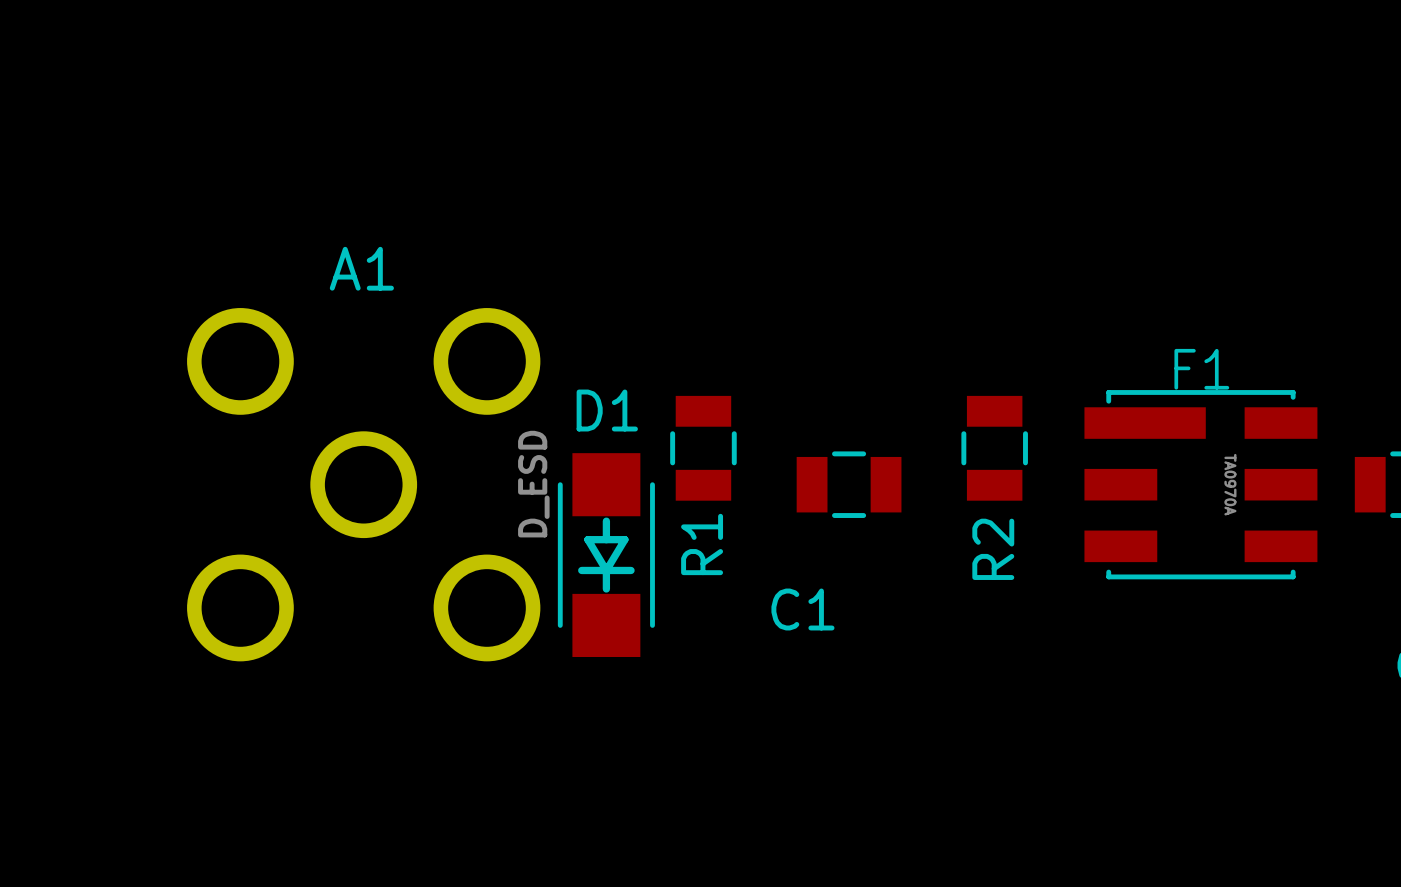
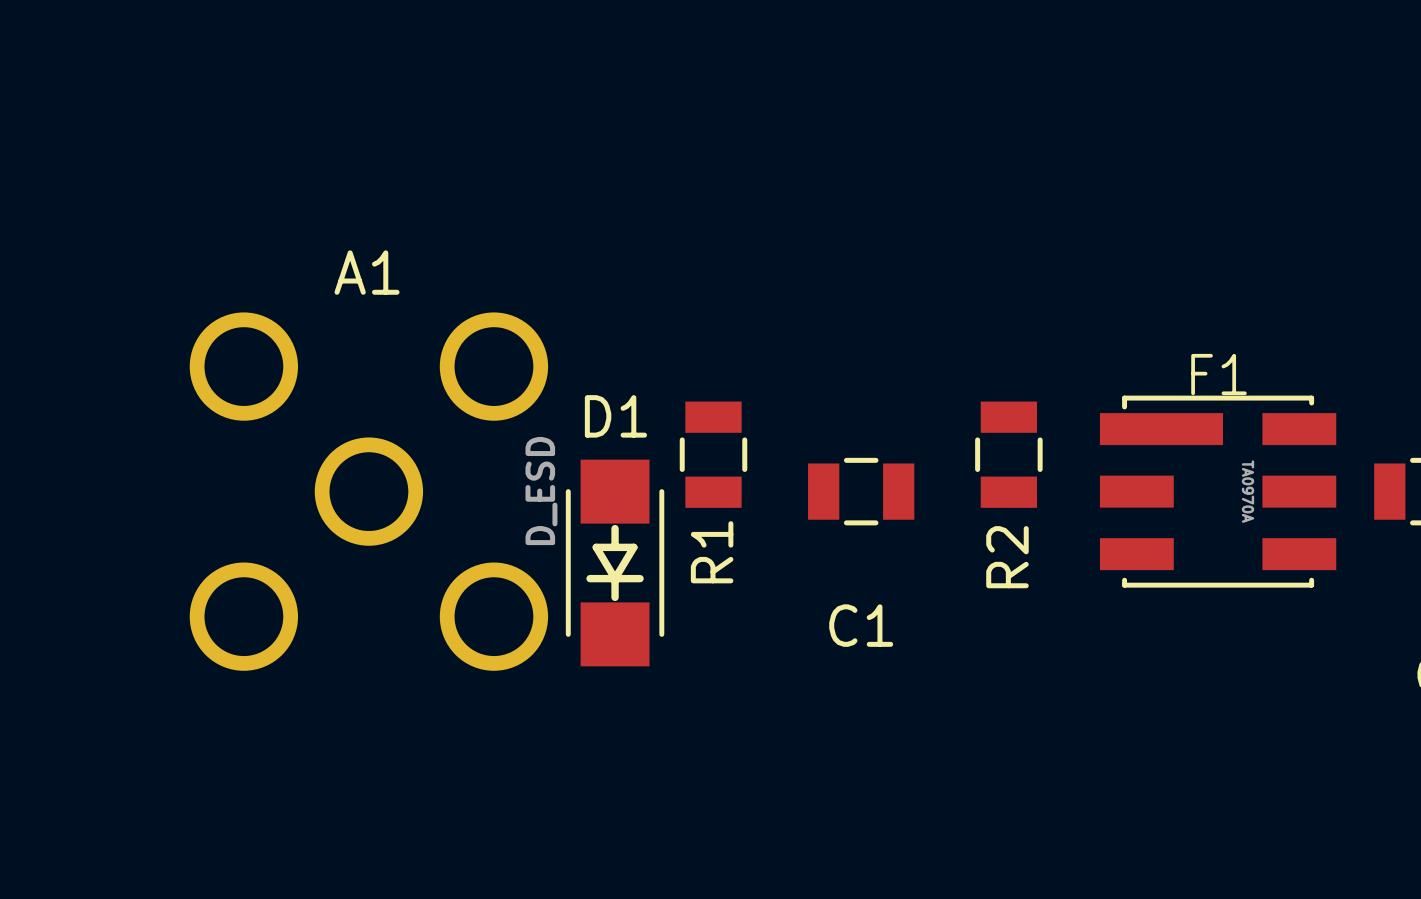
C1 name position: C1 (802, 609) -> C1 (861, 625)

